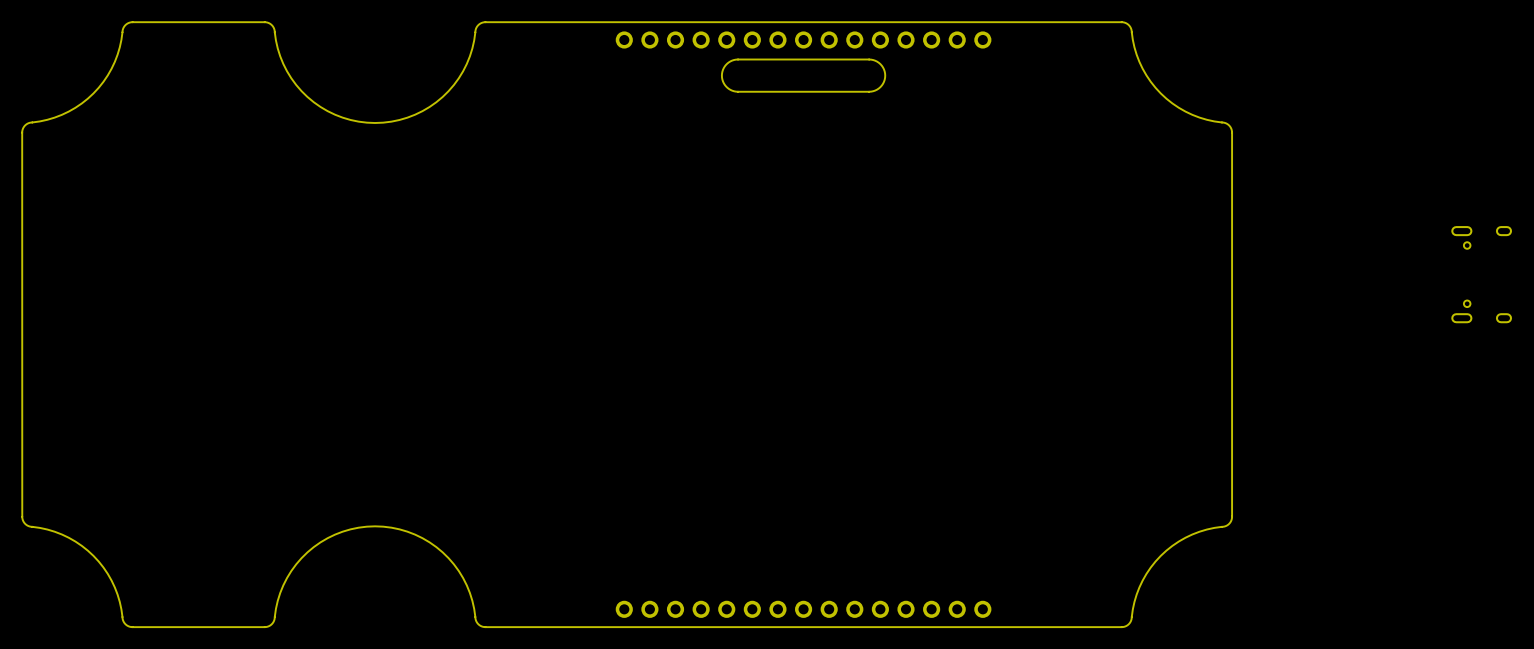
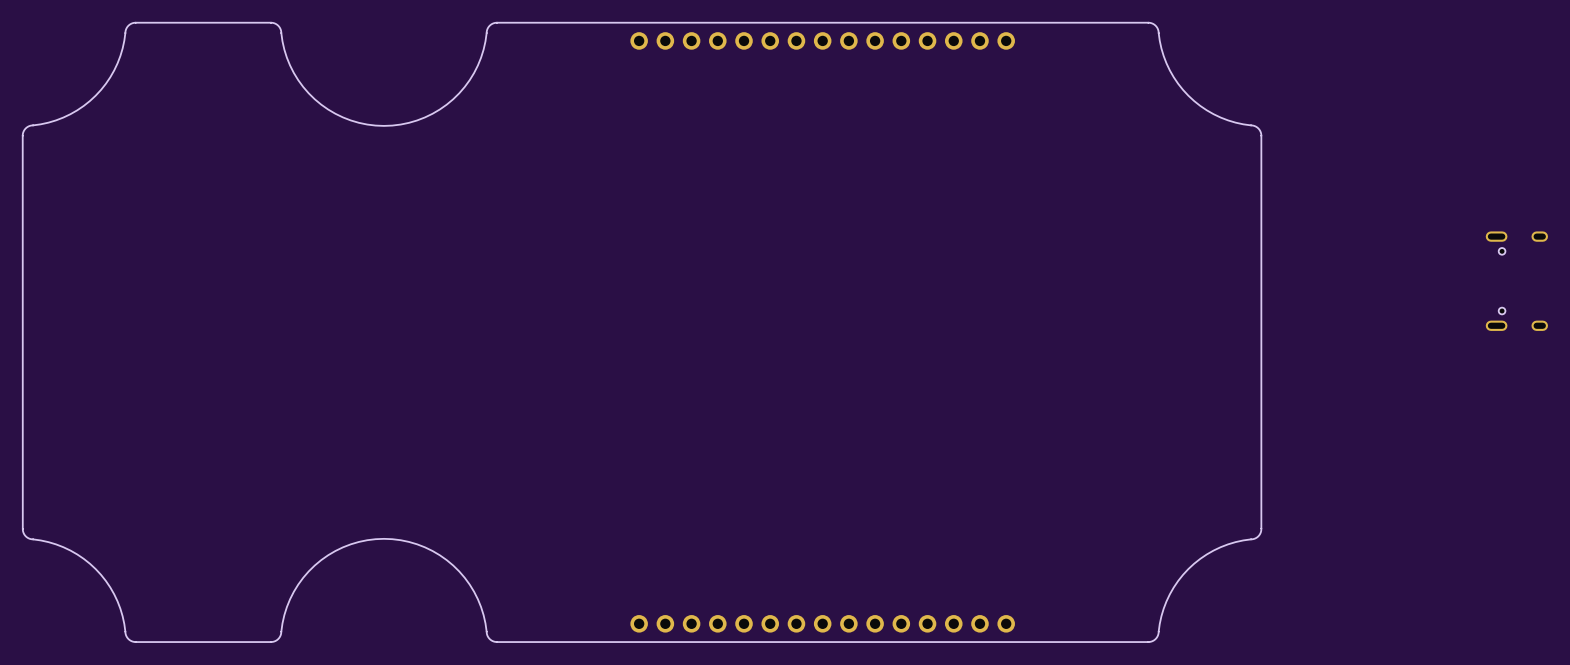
board edge: (869, 59) (736, 59) (724, 66) (722, 77) (725, 86) (736, 91) (871, 91) (880, 87) (885, 75) (880, 64) (869, 59) -> none

